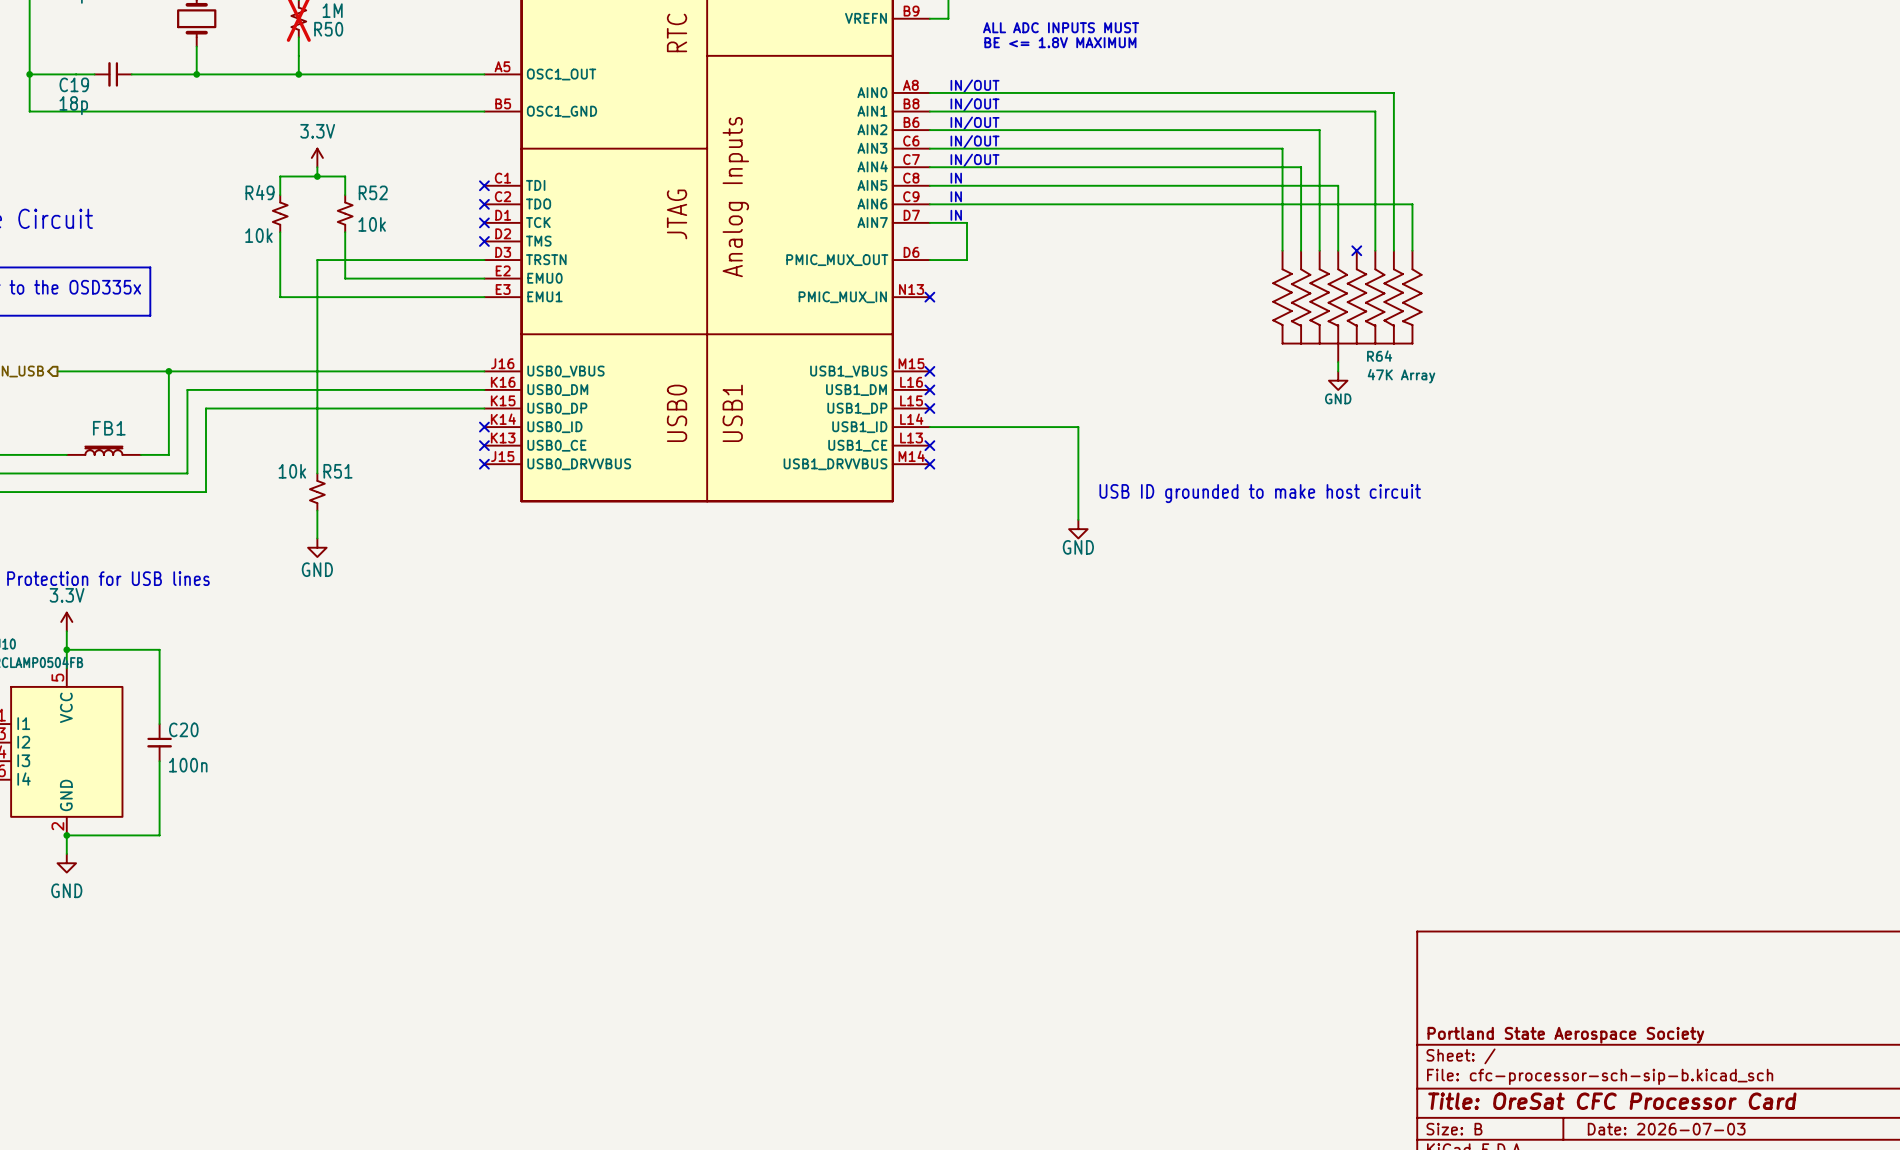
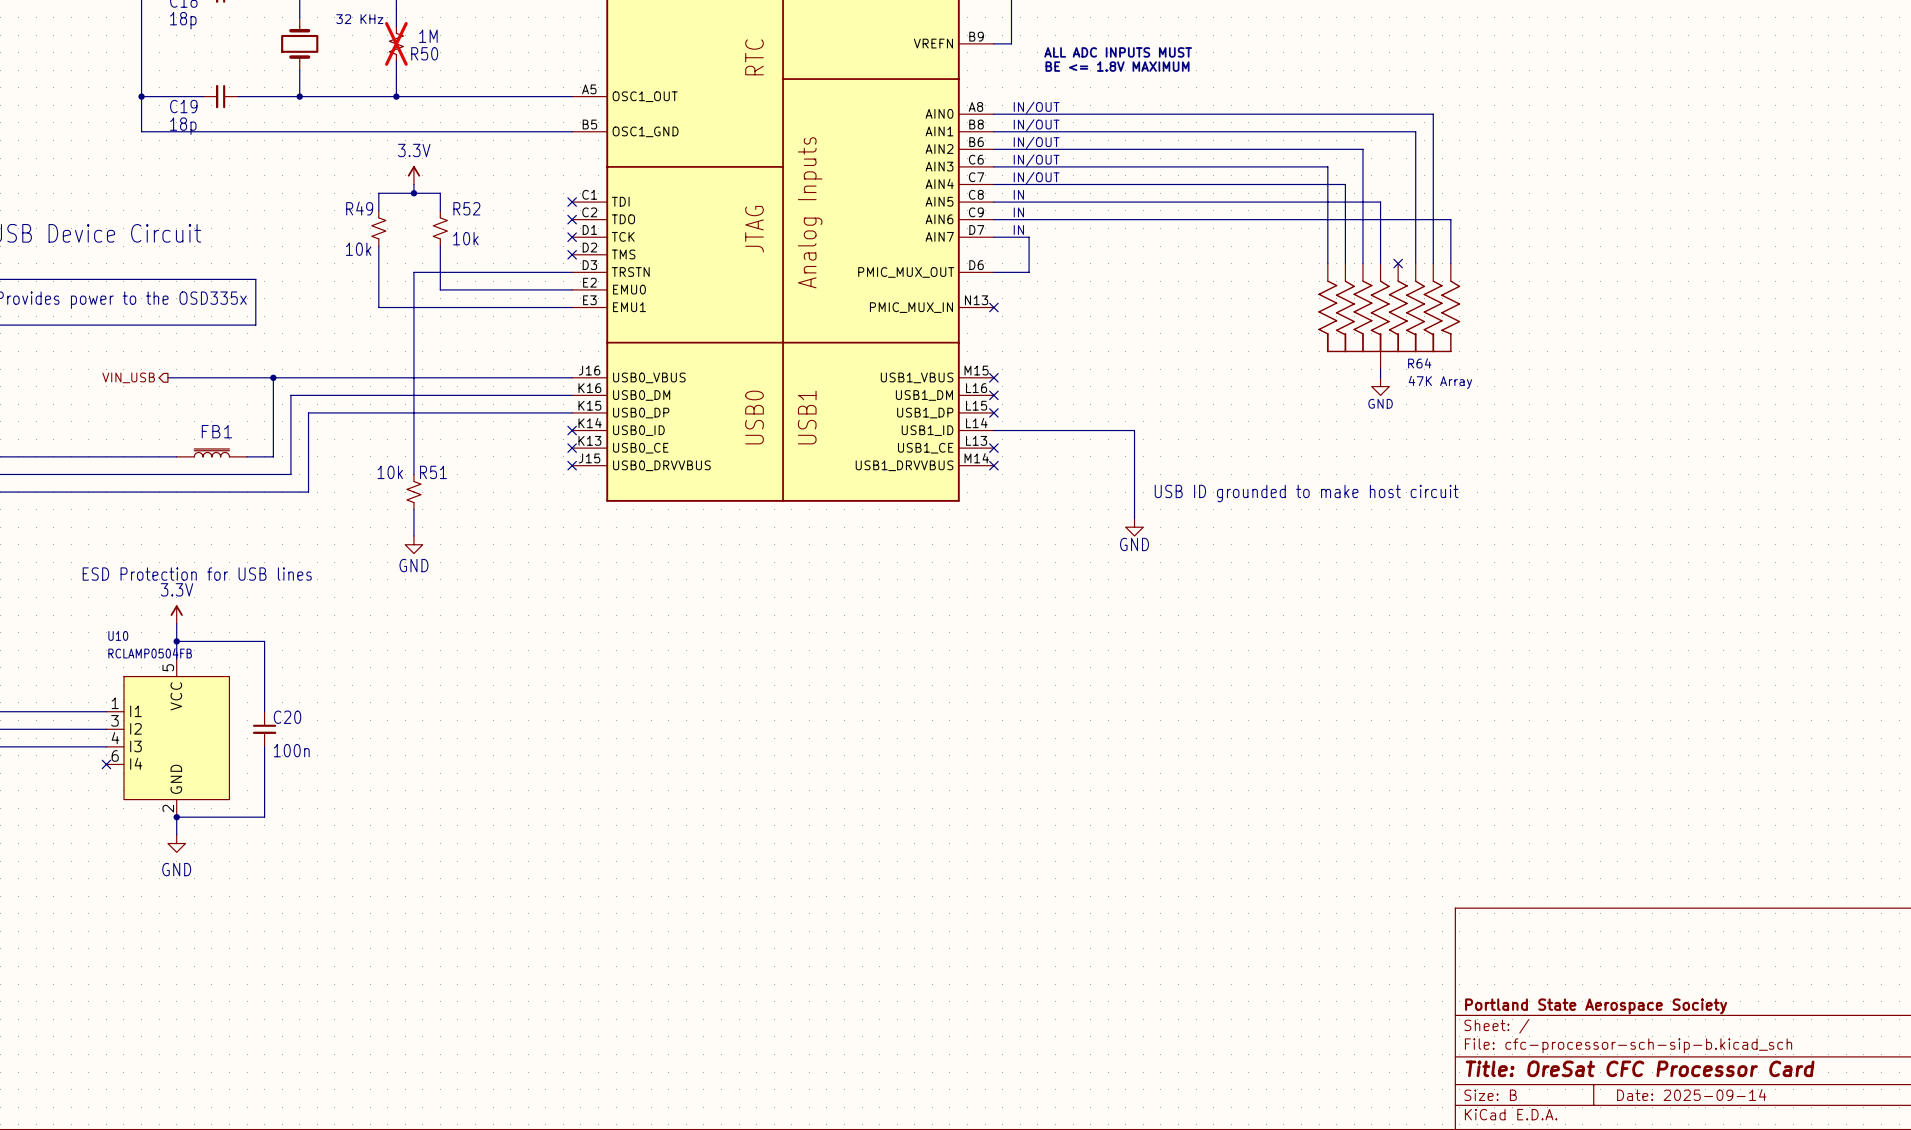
title block: Date: 2026-07-03 (1666, 1129) -> Date: 2025-09-14 (1691, 1095)

